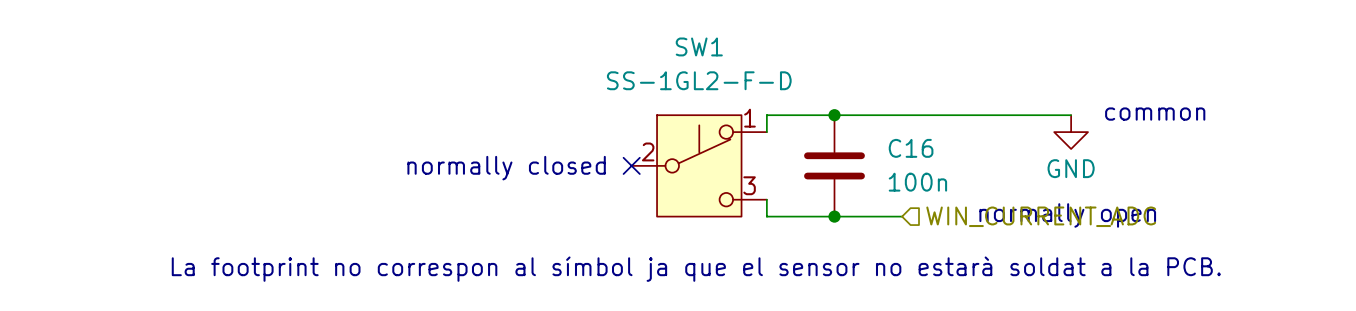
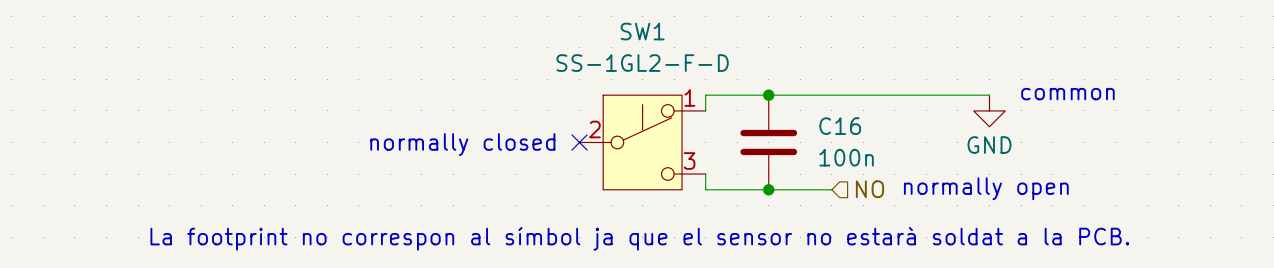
hierarchical label: WIN_CURRENT_ADC (1041, 216) -> NO (869, 189)

